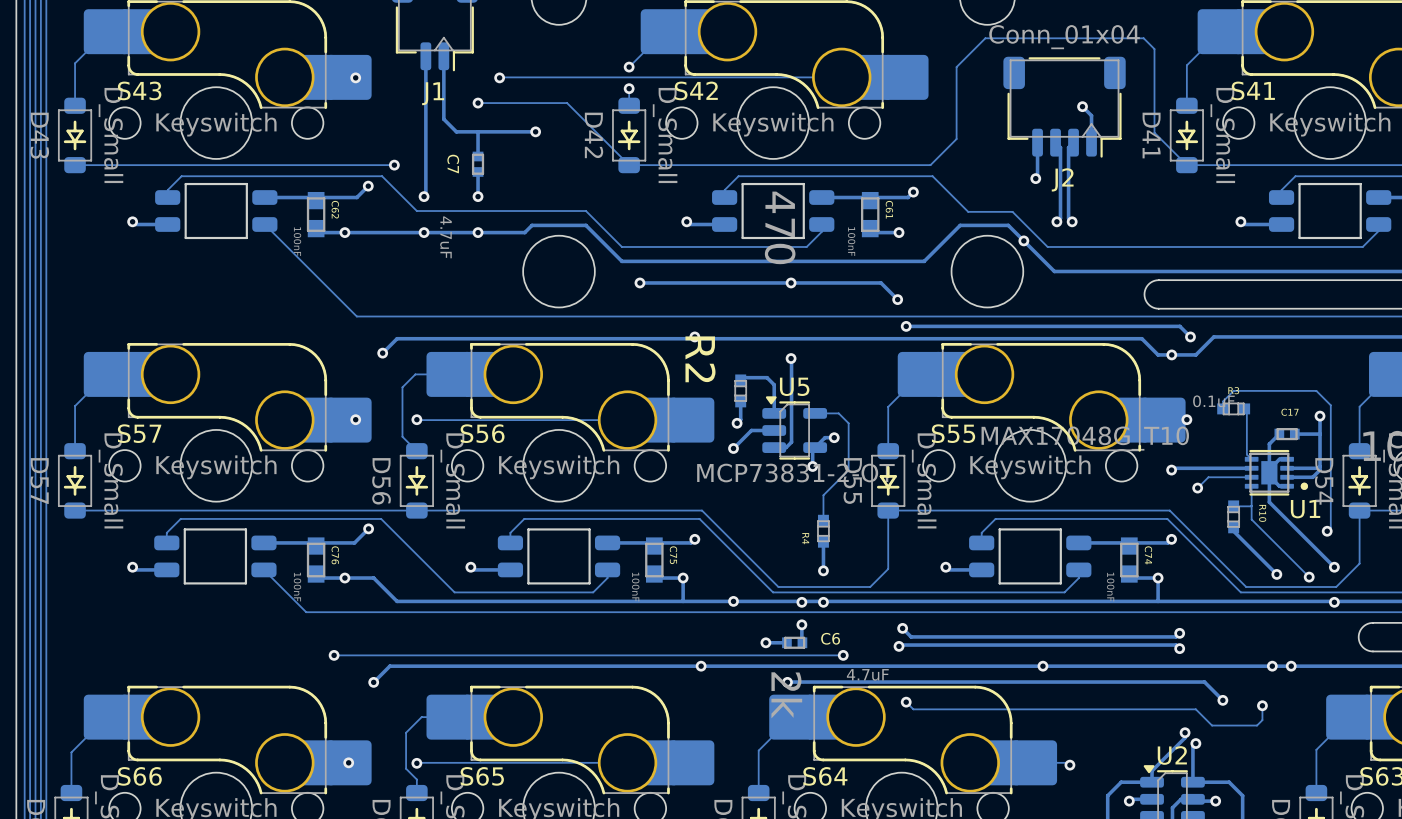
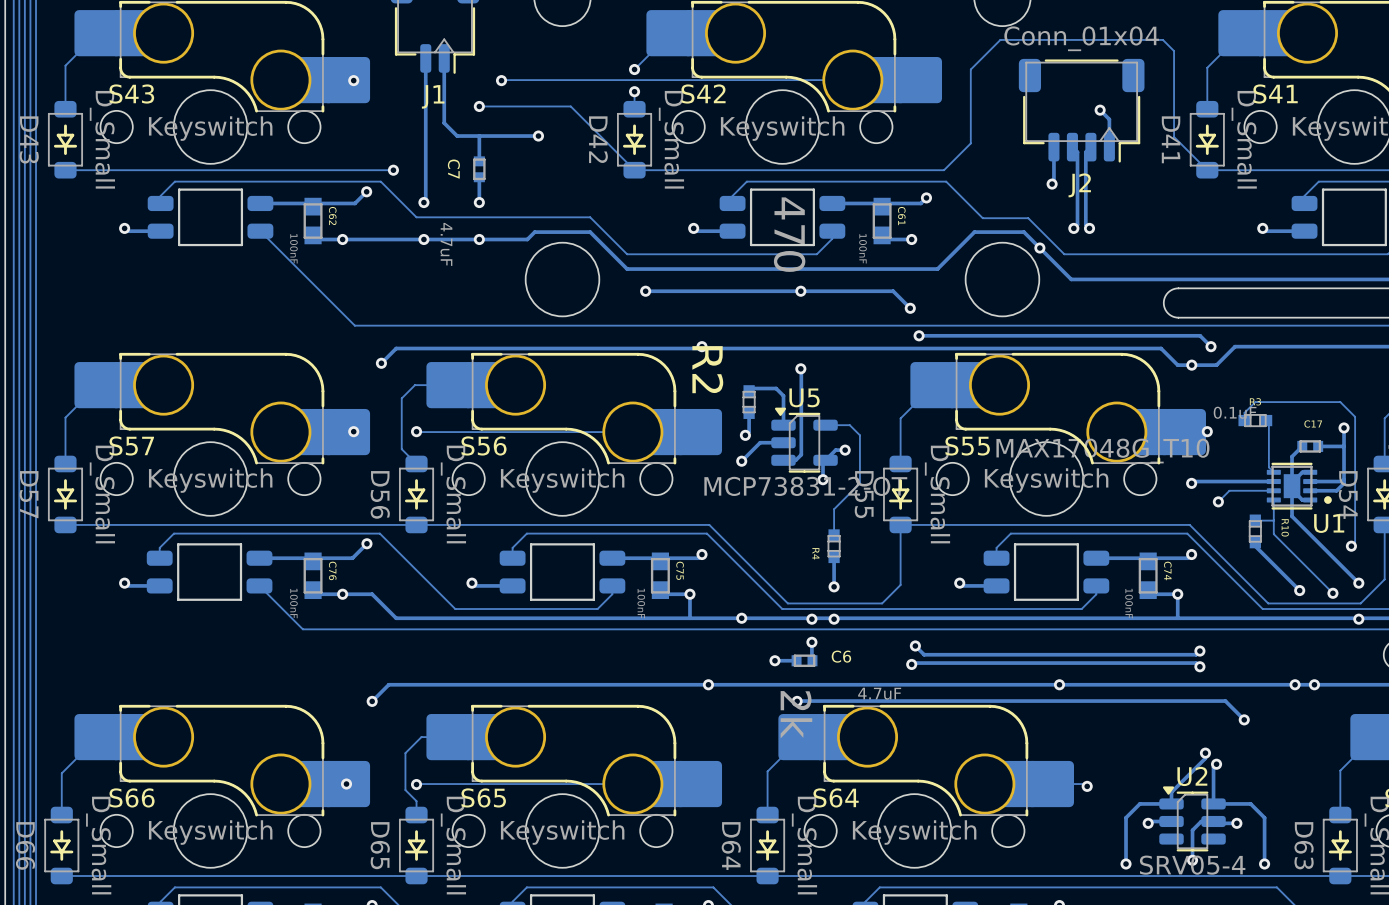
via: (334, 655) -> none
track: (843, 655) (334, 655) -> none
via: (843, 655) -> none
track: (906, 702) (913, 709) (1195, 709) (1212, 725) (1257, 725) (1262, 720) (1262, 705) -> none
via: (906, 702) -> none
via: (1262, 705) -> none

